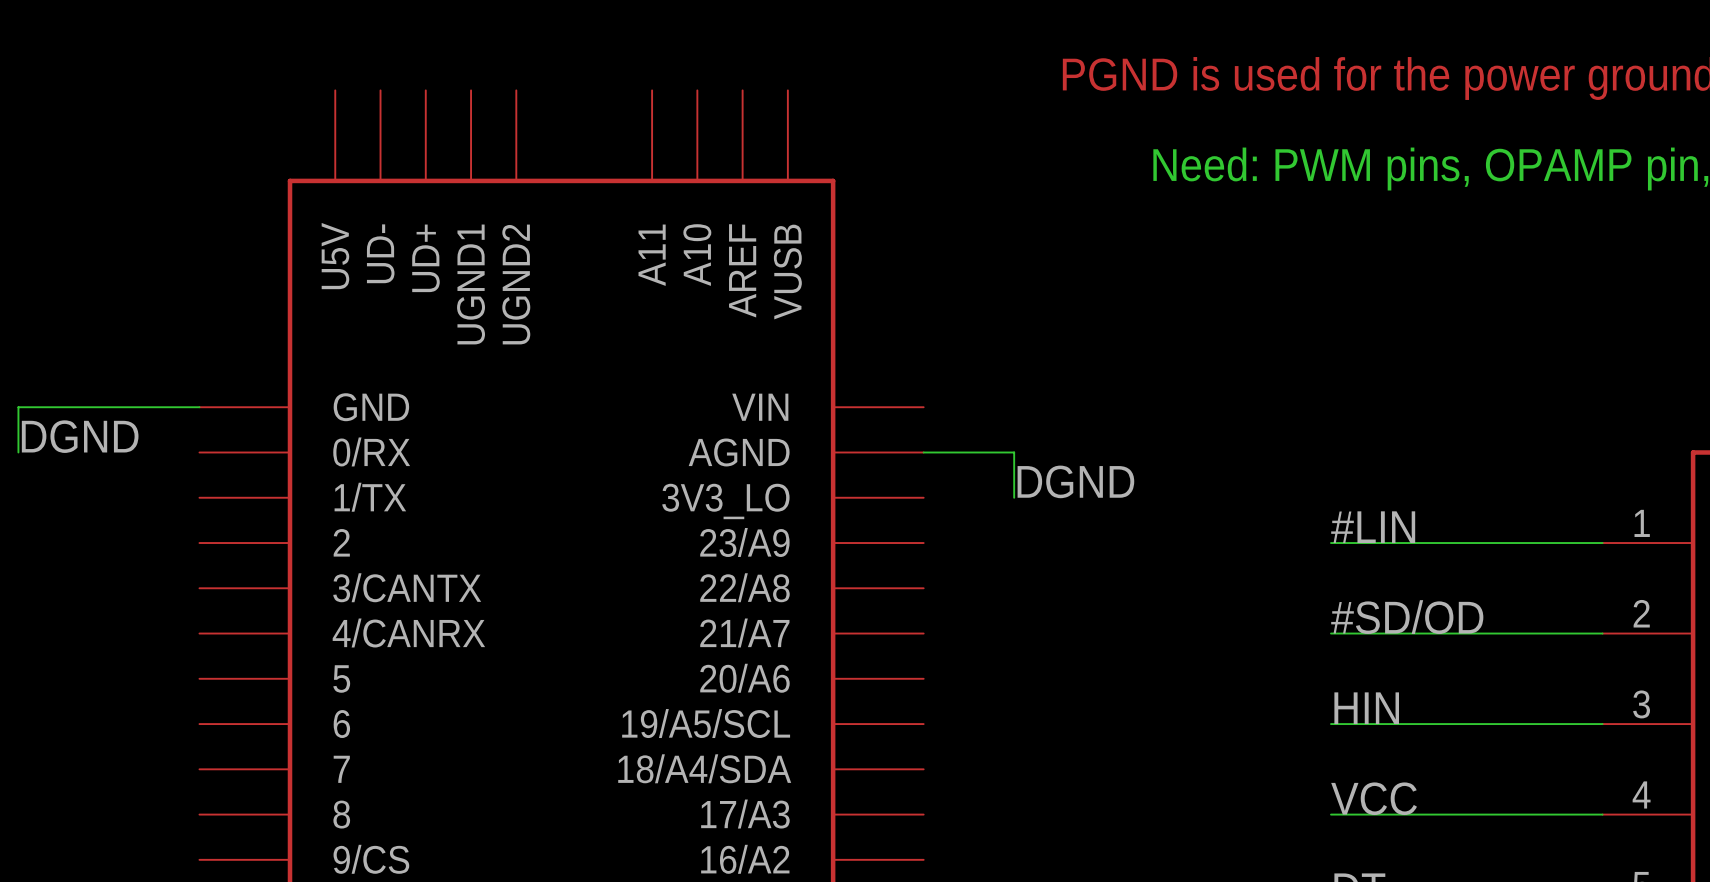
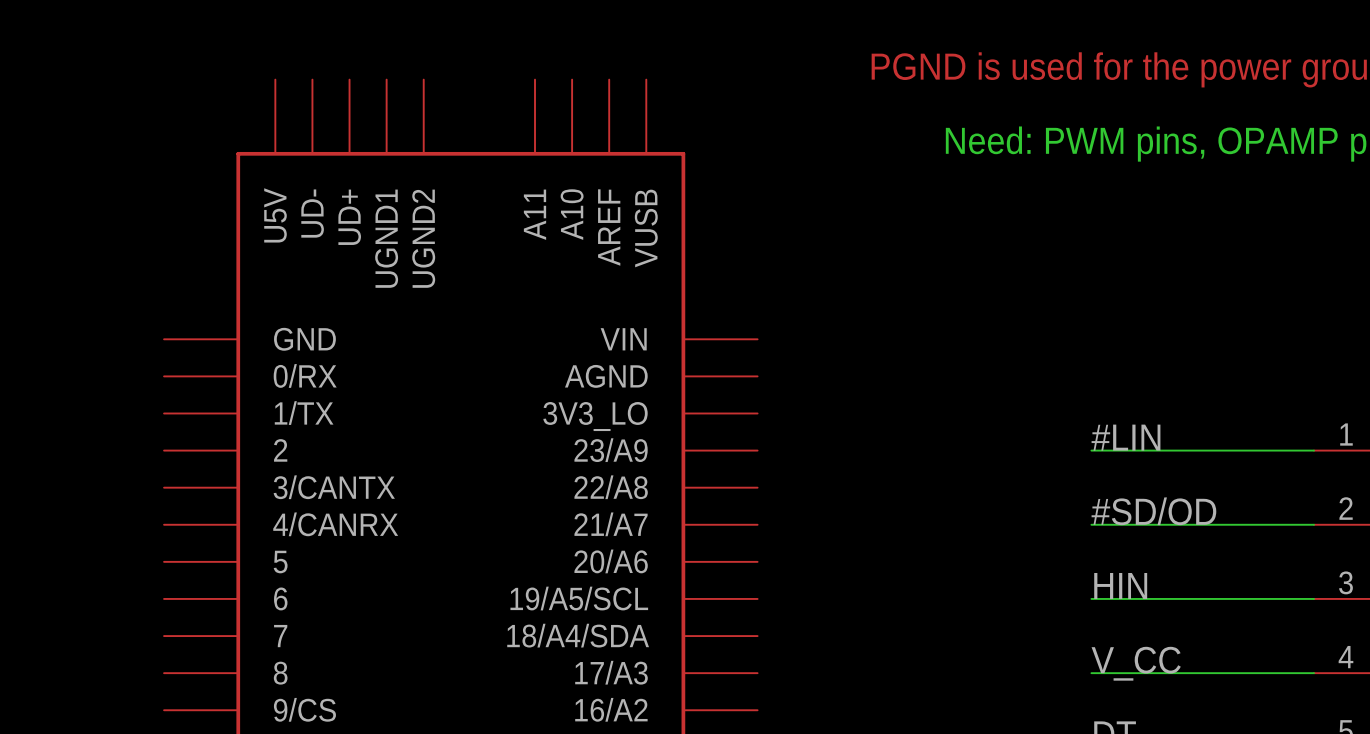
wire: (199, 407) (18, 407) (18, 452) -> none
label: DGND (80, 436) -> none
wire: (923, 452) (1014, 452) (1014, 497) -> none
label: DGND (1075, 481) -> none
label: VCC (1374, 798) -> V_CC (1136, 663)

